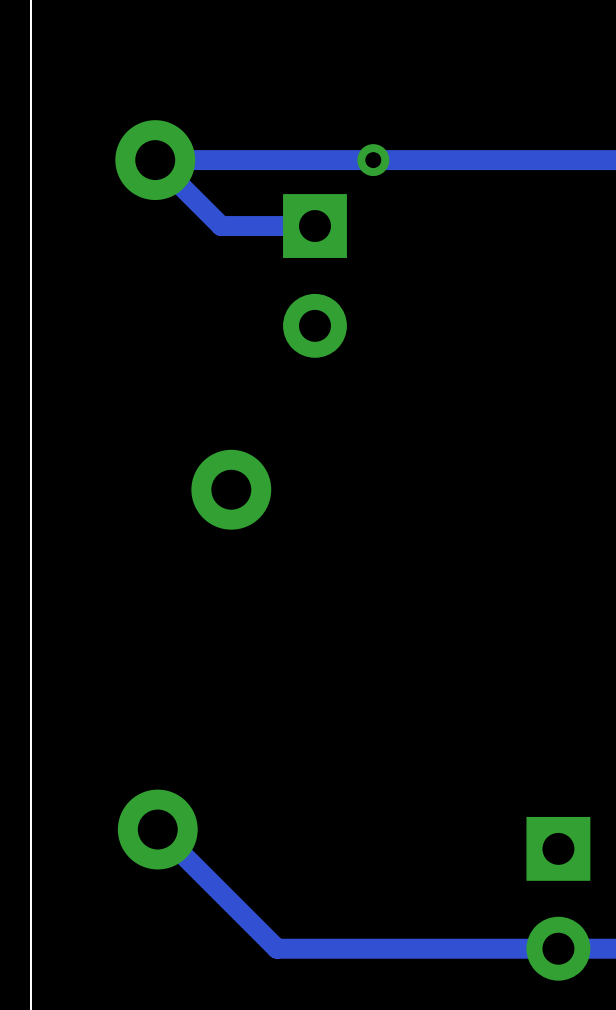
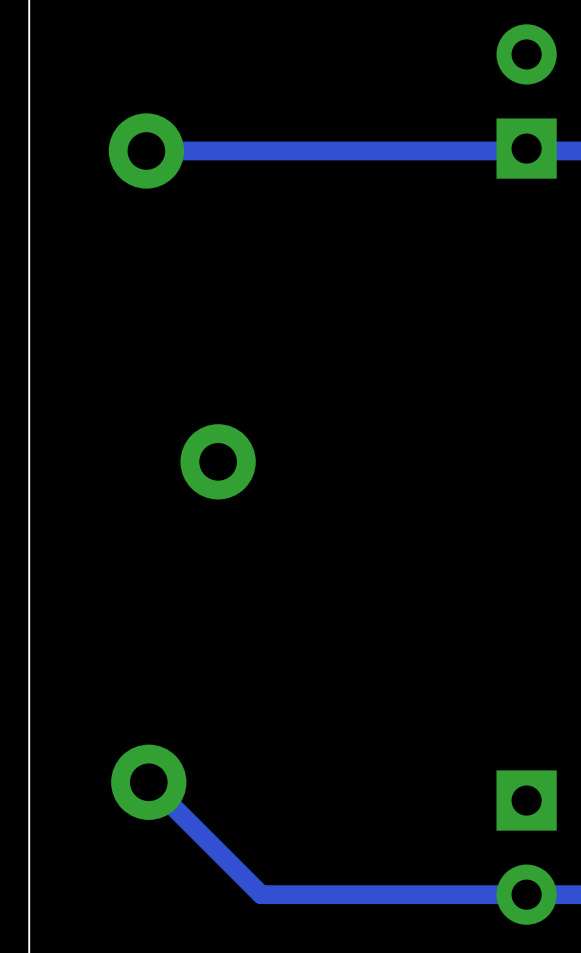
via: (373, 160) -> none
track: (156, 161) (221, 226) (314, 226) -> none
part rotation: 0° (314, 275) -> 180° (526, 101)
part position: (314, 275) -> (526, 101)

